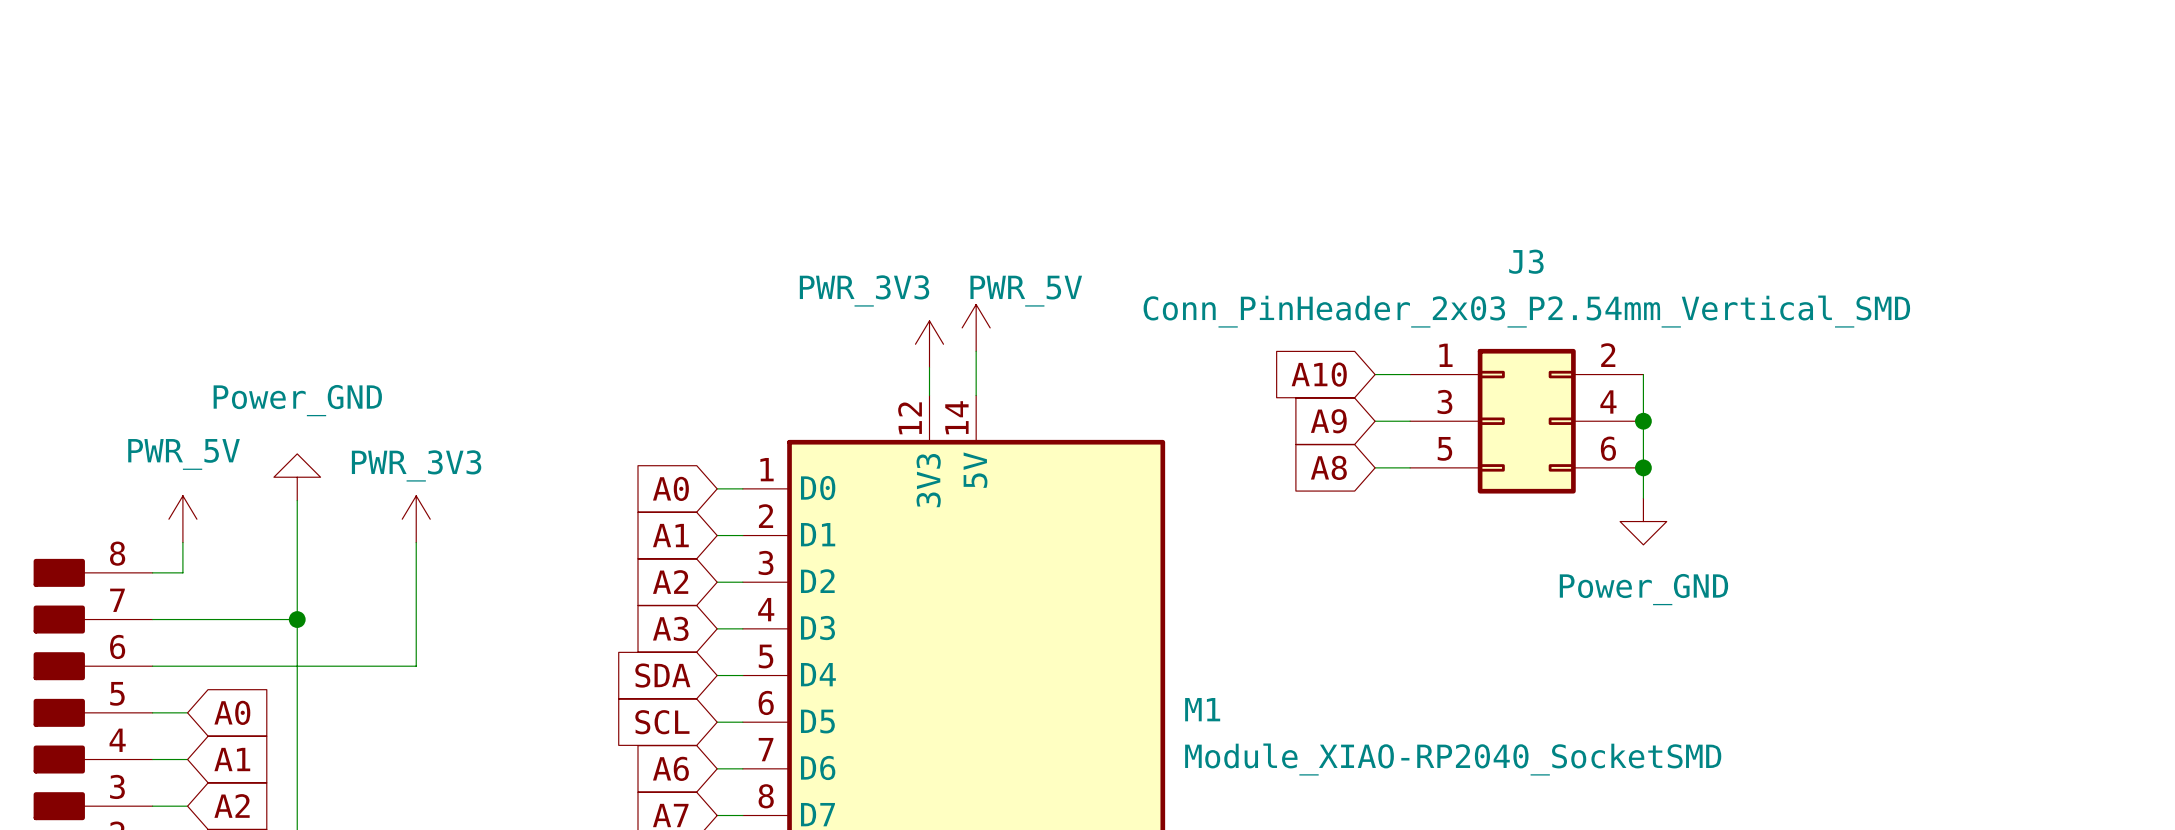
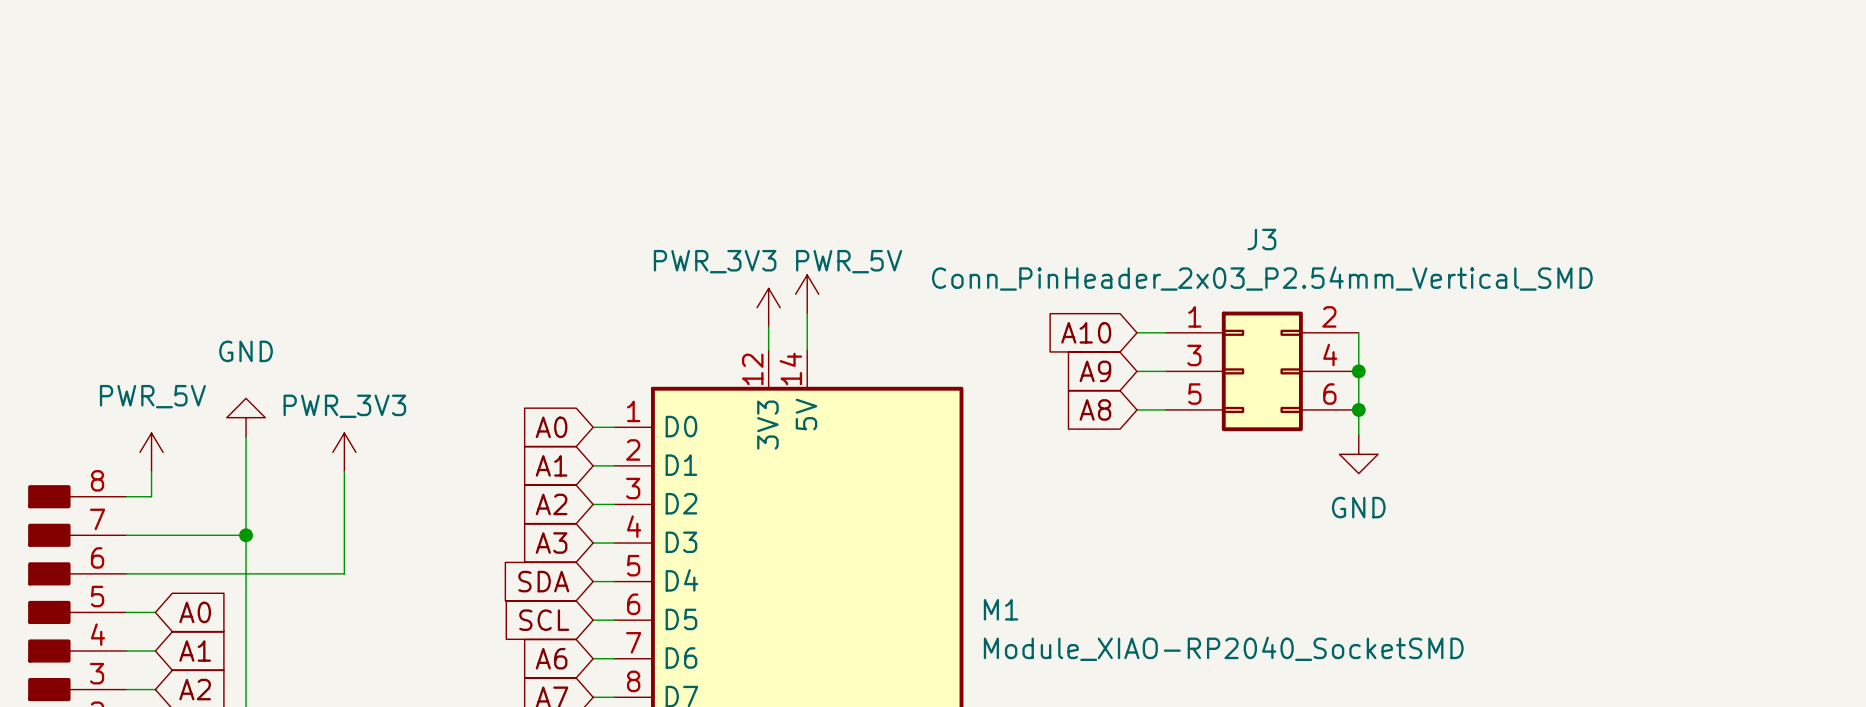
power symbol: Power_GND (297, 477) -> GND (246, 417)
power symbol: Power_GND (1643, 521) -> GND (1358, 454)

